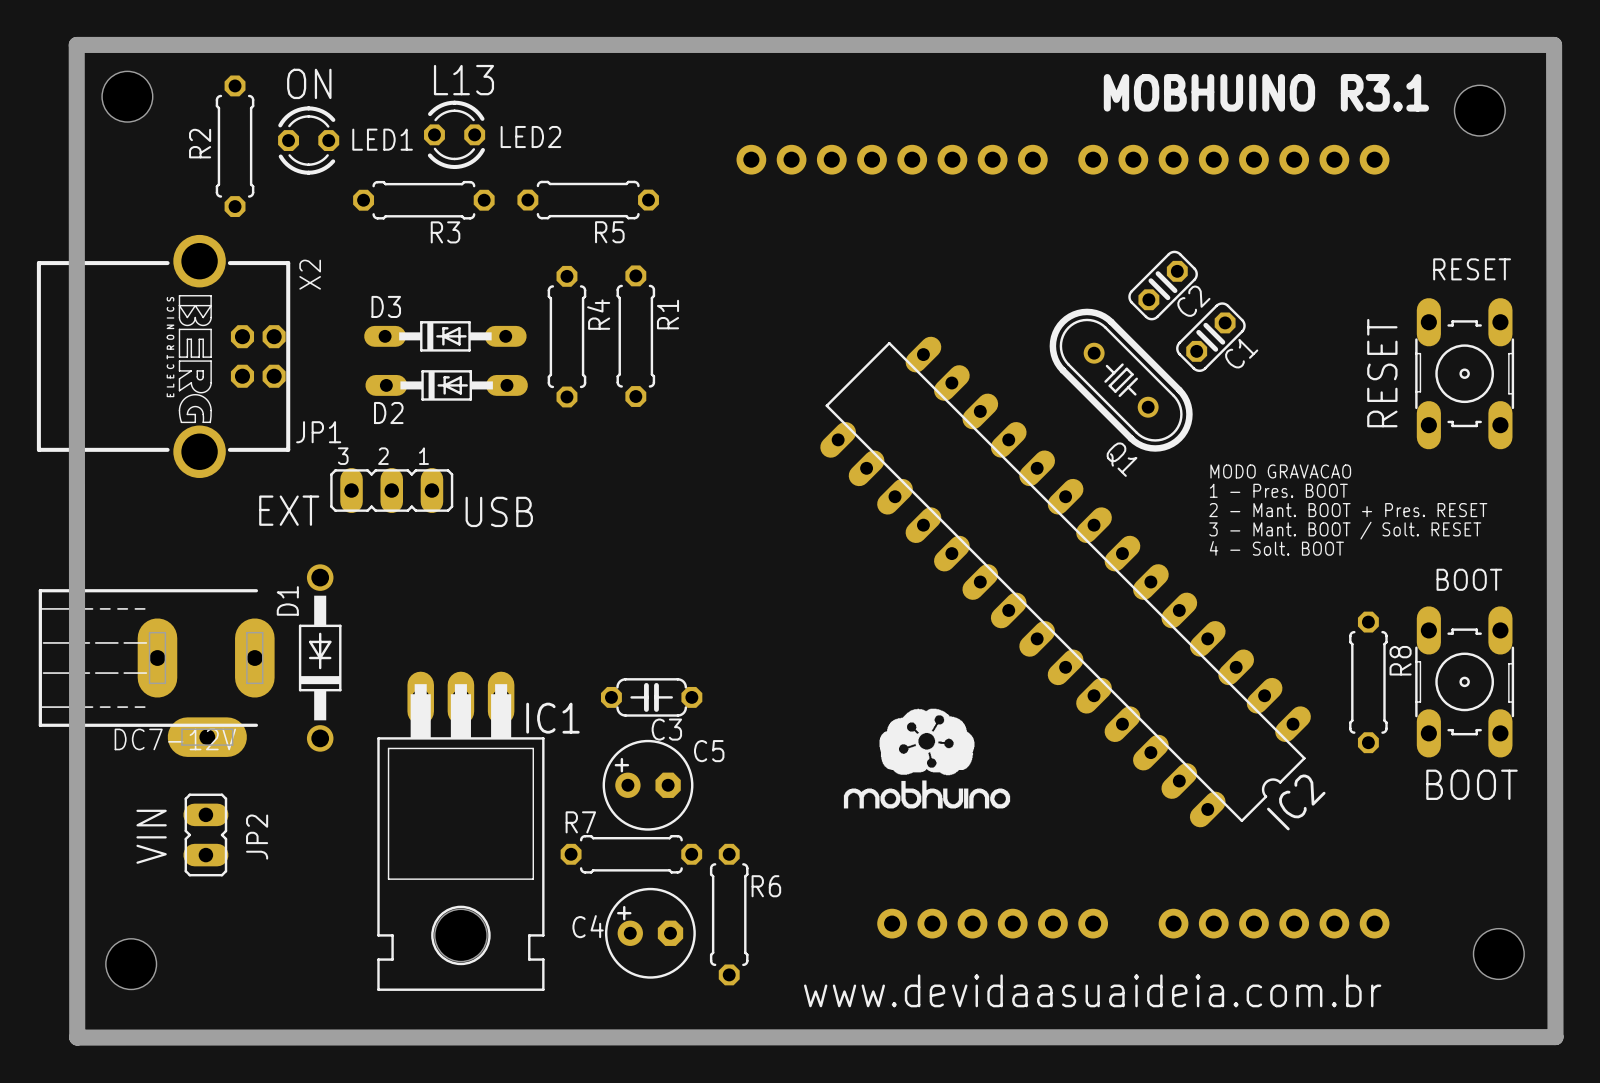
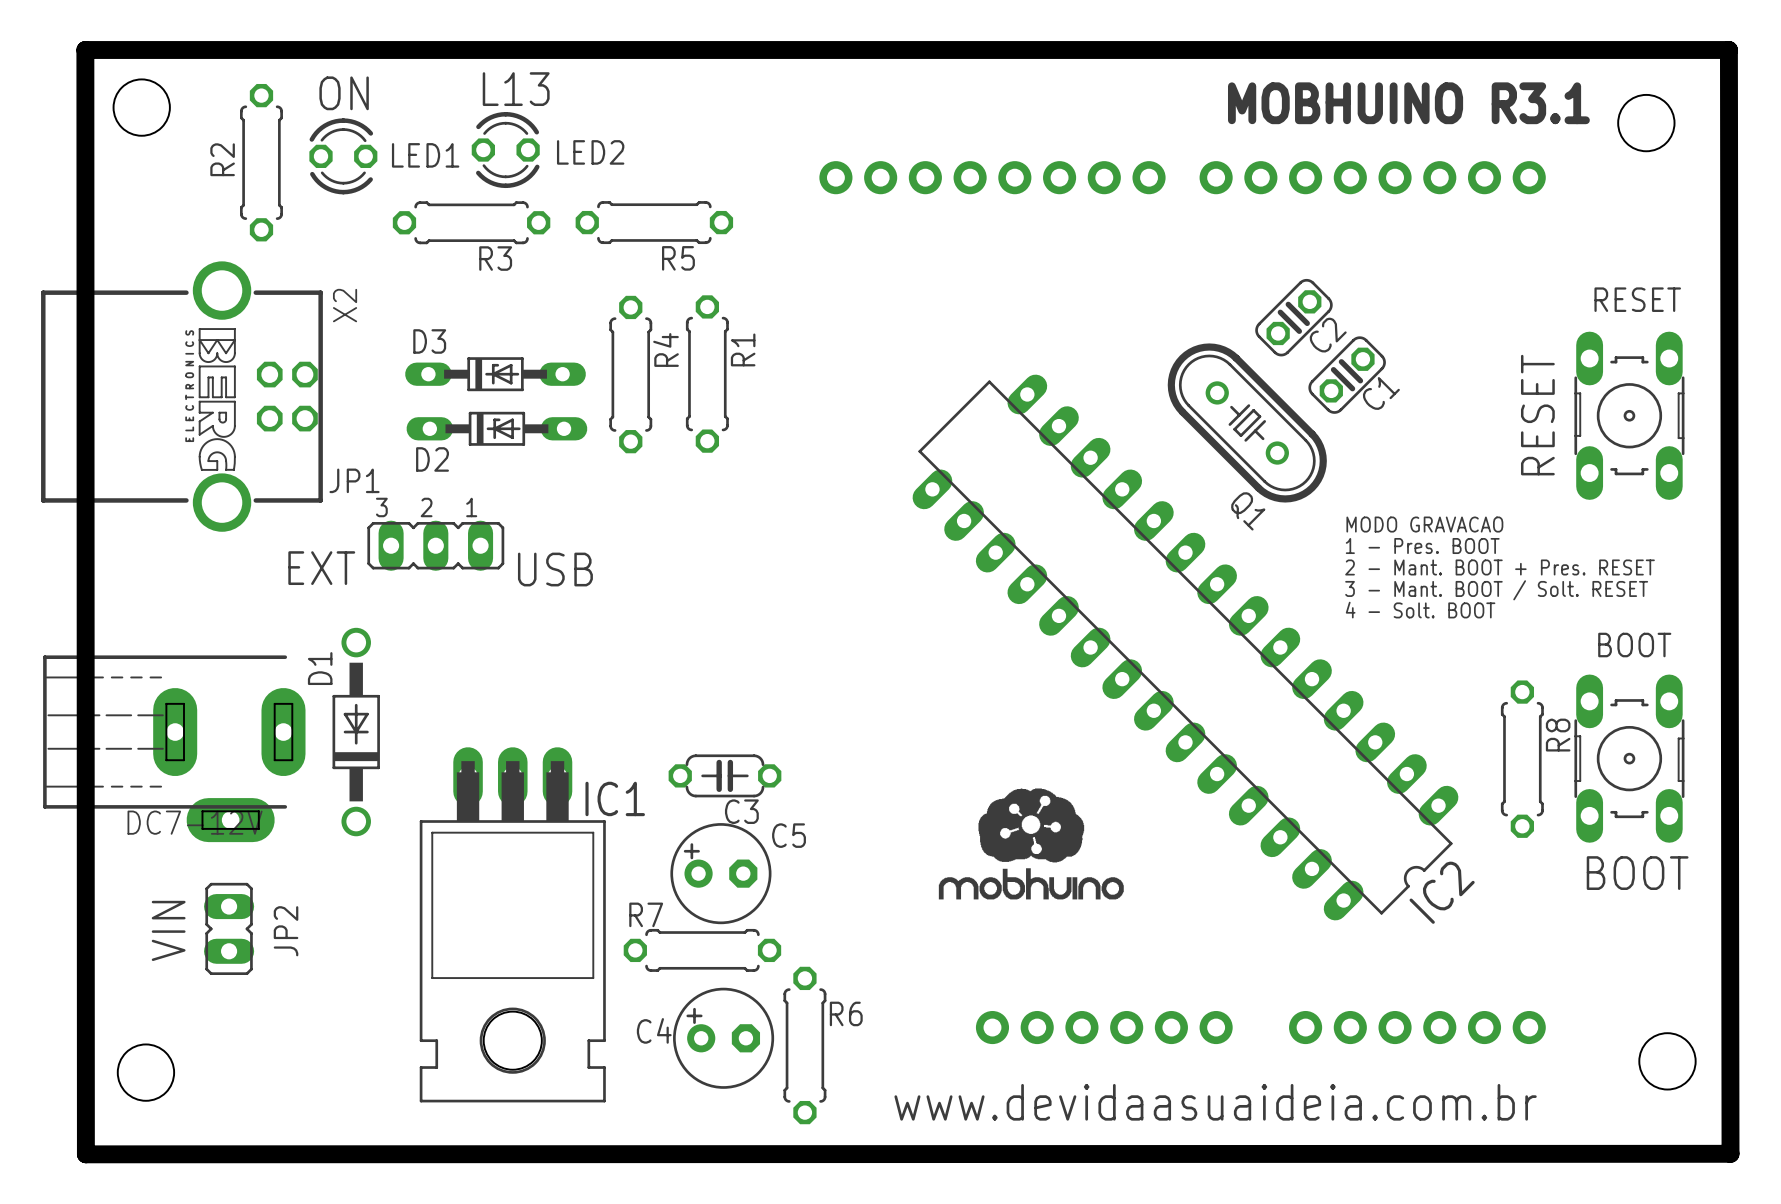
R6 position: (729, 914) -> (804, 1045)

